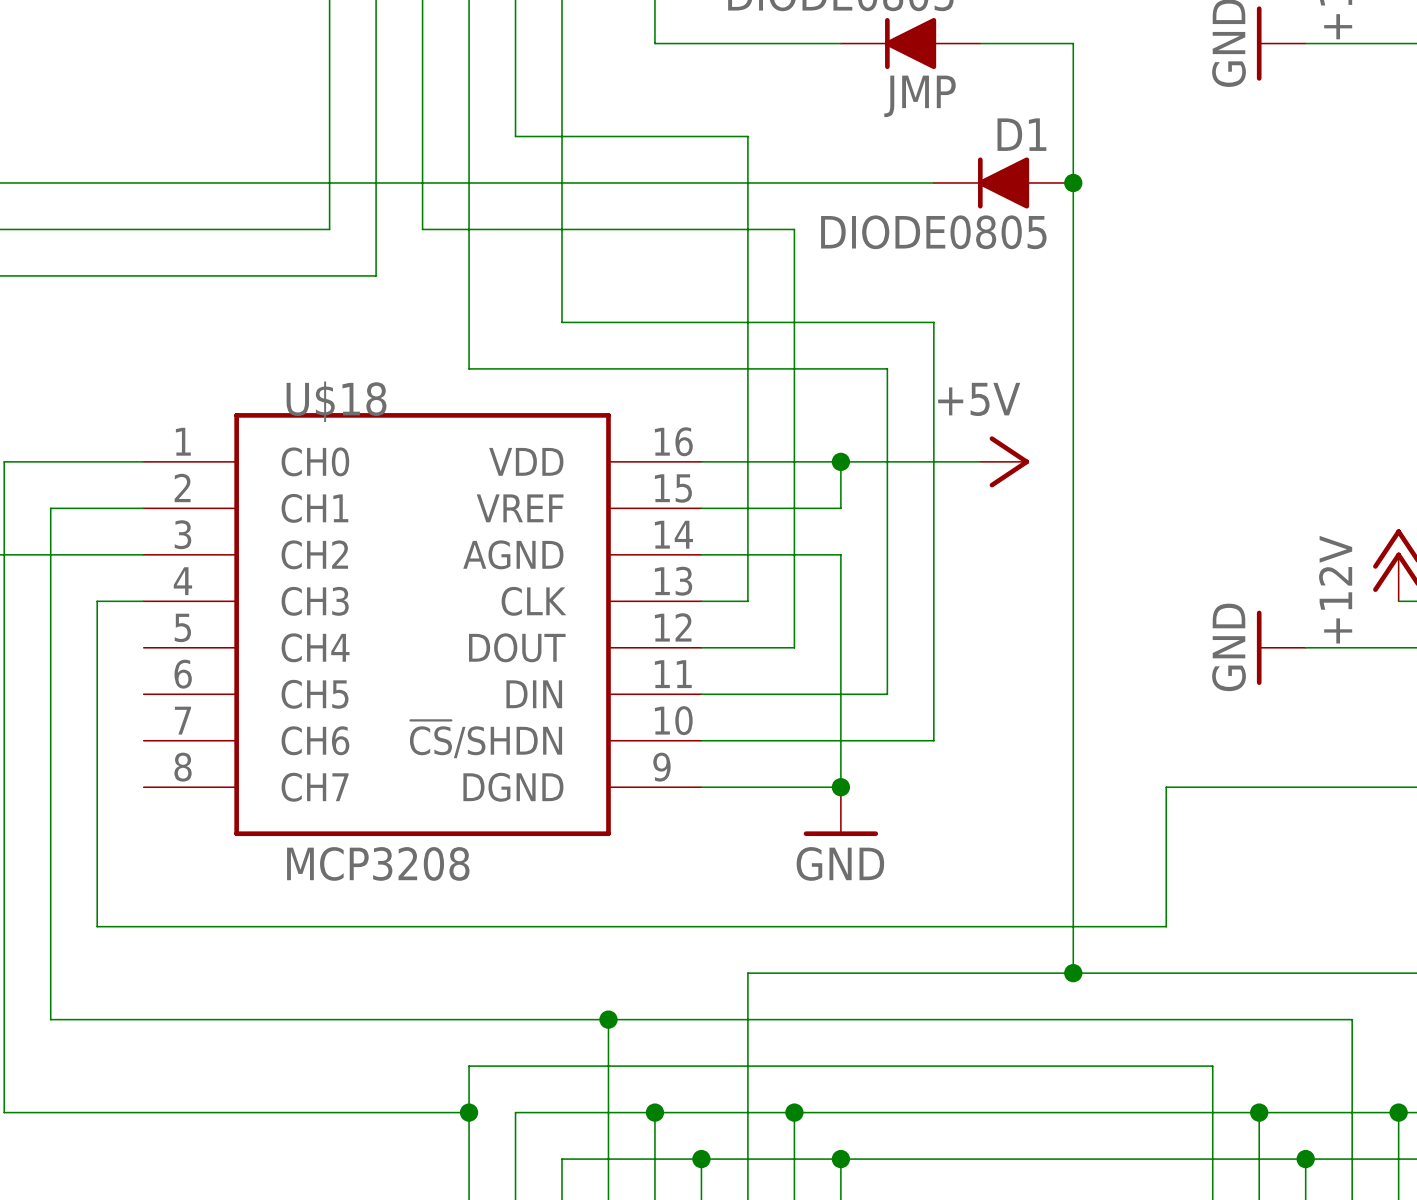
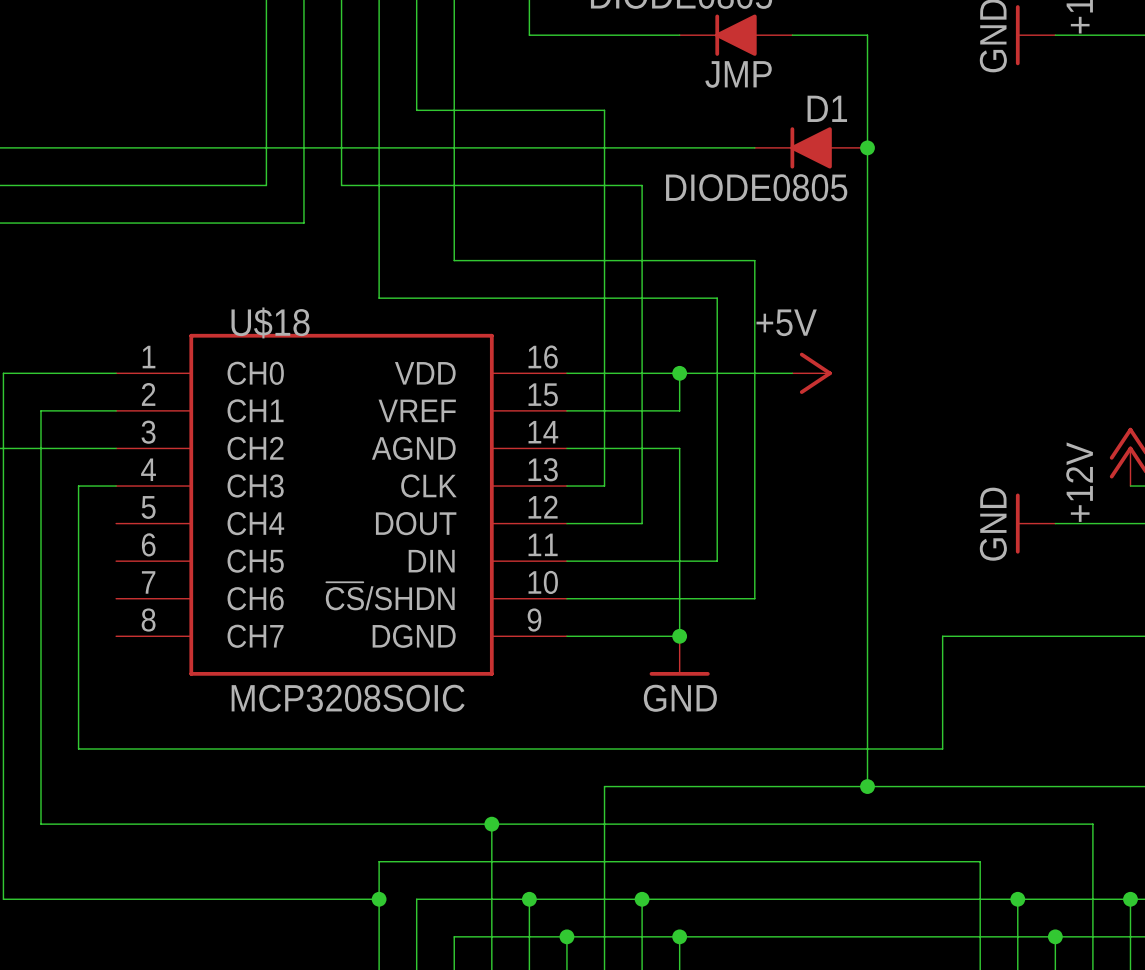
U$18 value: MCP3208 (378, 863) -> MCP3208SOIC (348, 698)

